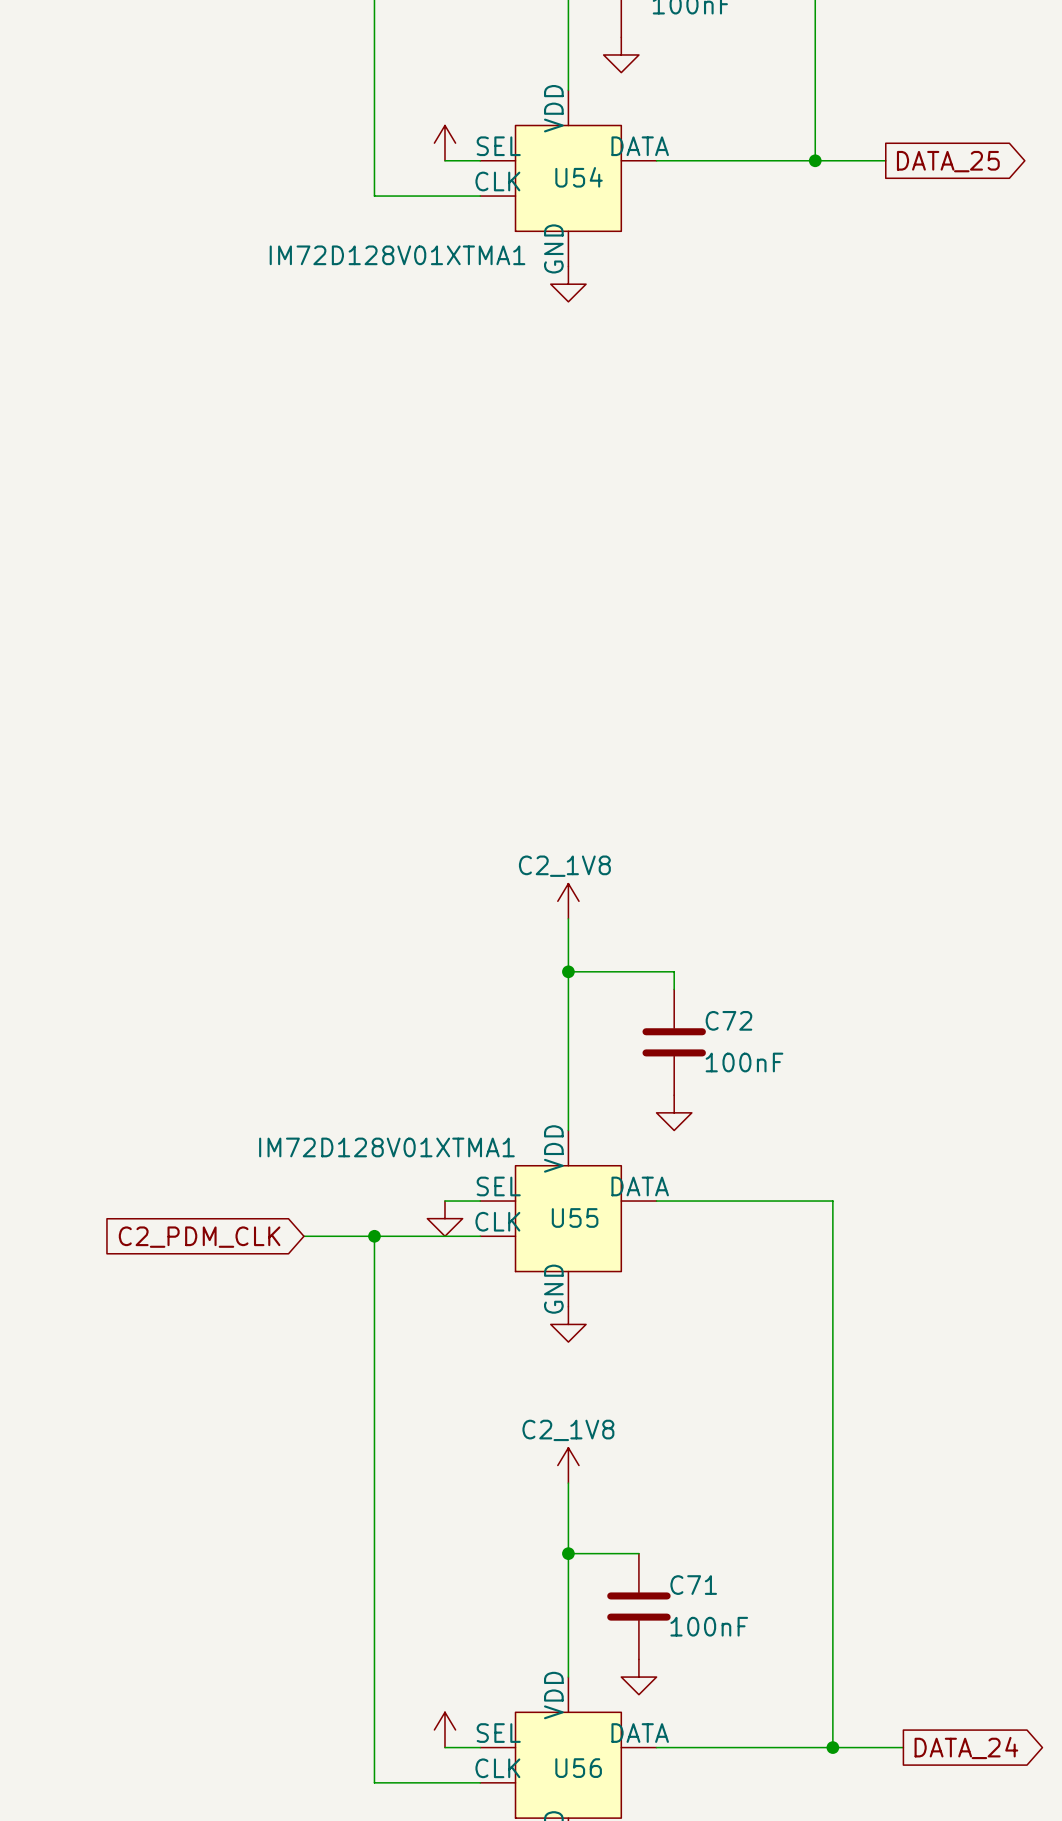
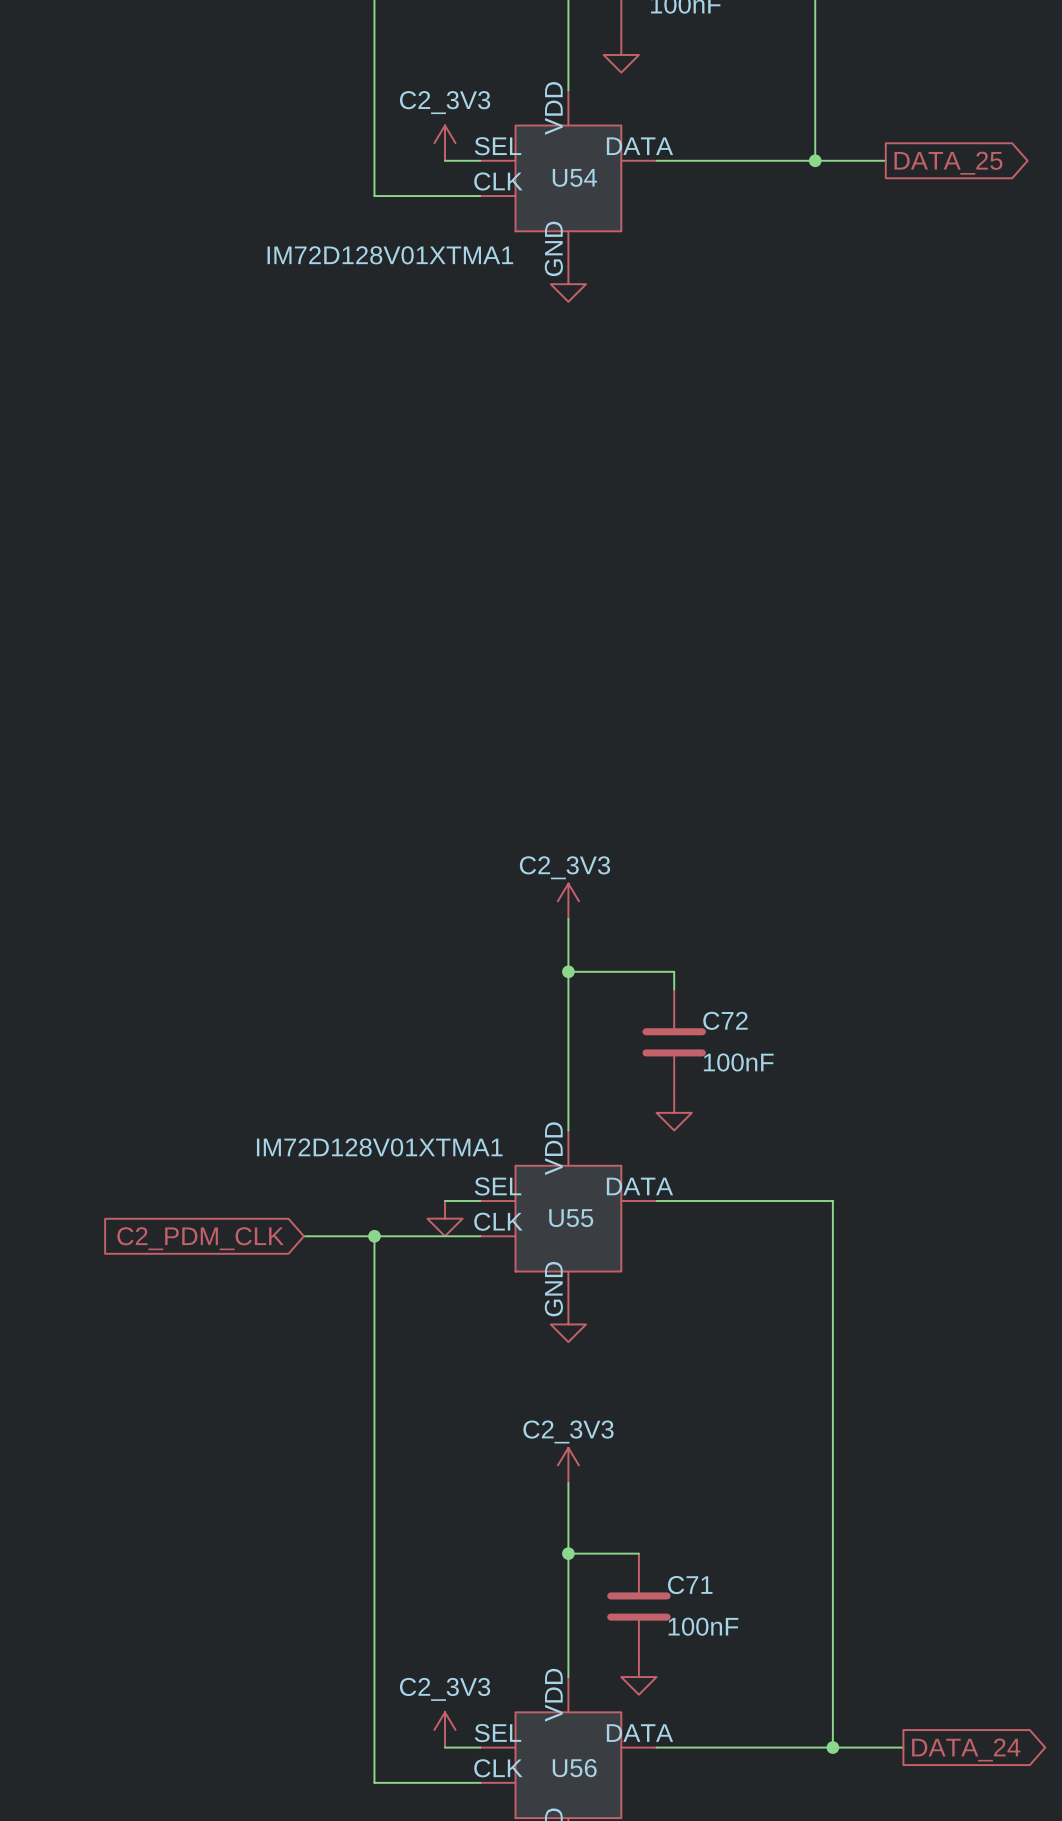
power symbol text: none -> C2_3V3 (445, 102)
power symbol: C2_1V8 (568, 901) -> C2_3V3 (568, 901)
power symbol: C2_1V8 (568, 1465) -> C2_3V3 (568, 1465)
power symbol text: none -> C2_3V3 (445, 1689)

